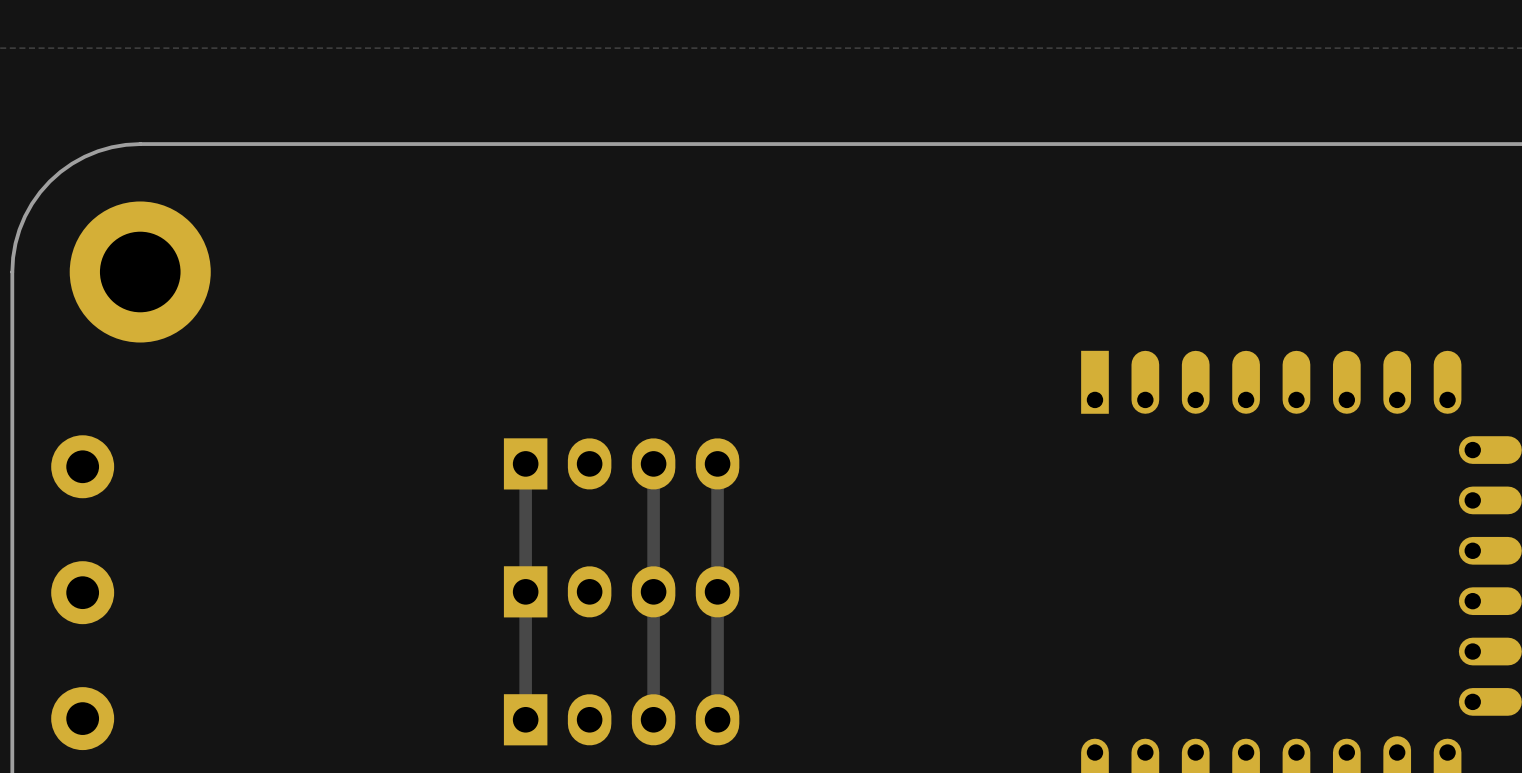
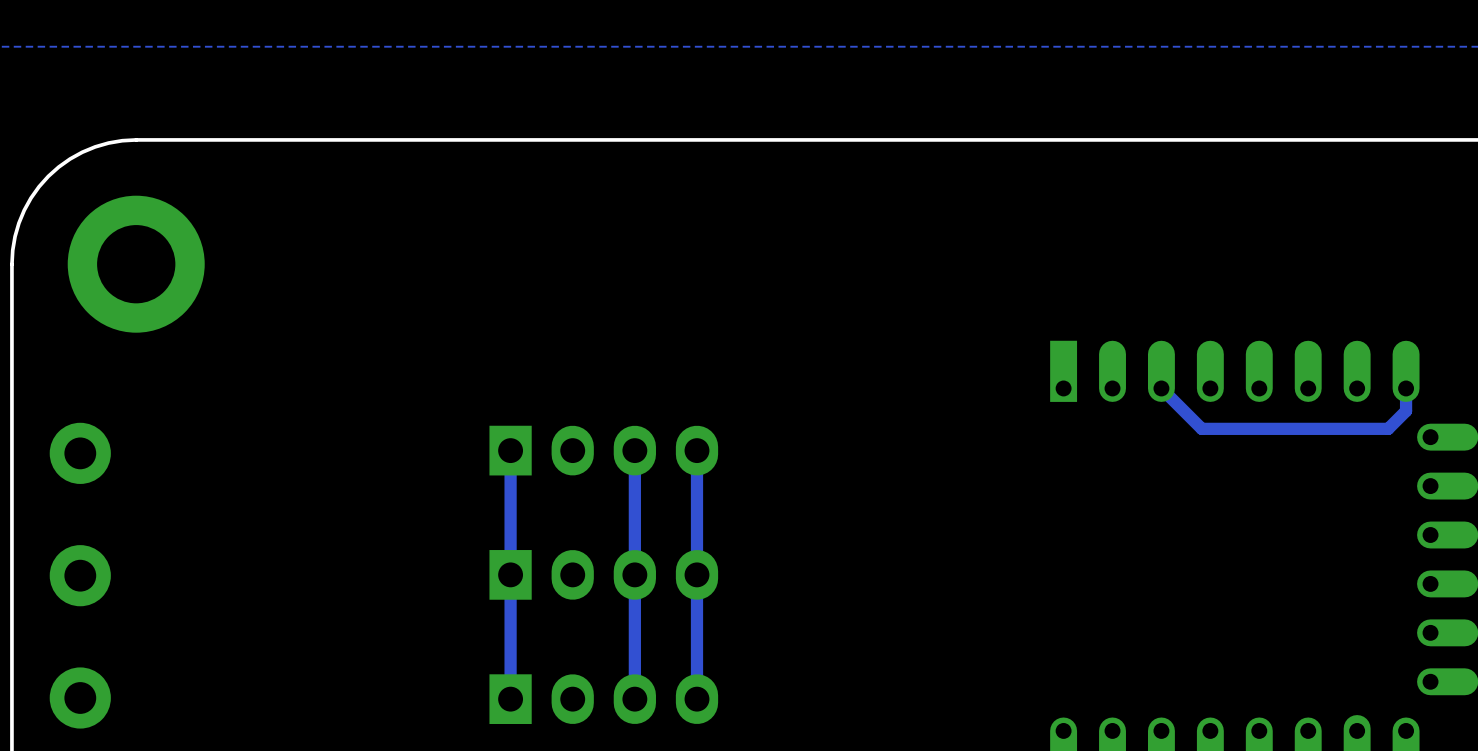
track: none -> (1406, 388) (1406, 411) (1388, 428) (1201, 428) (1161, 388)

